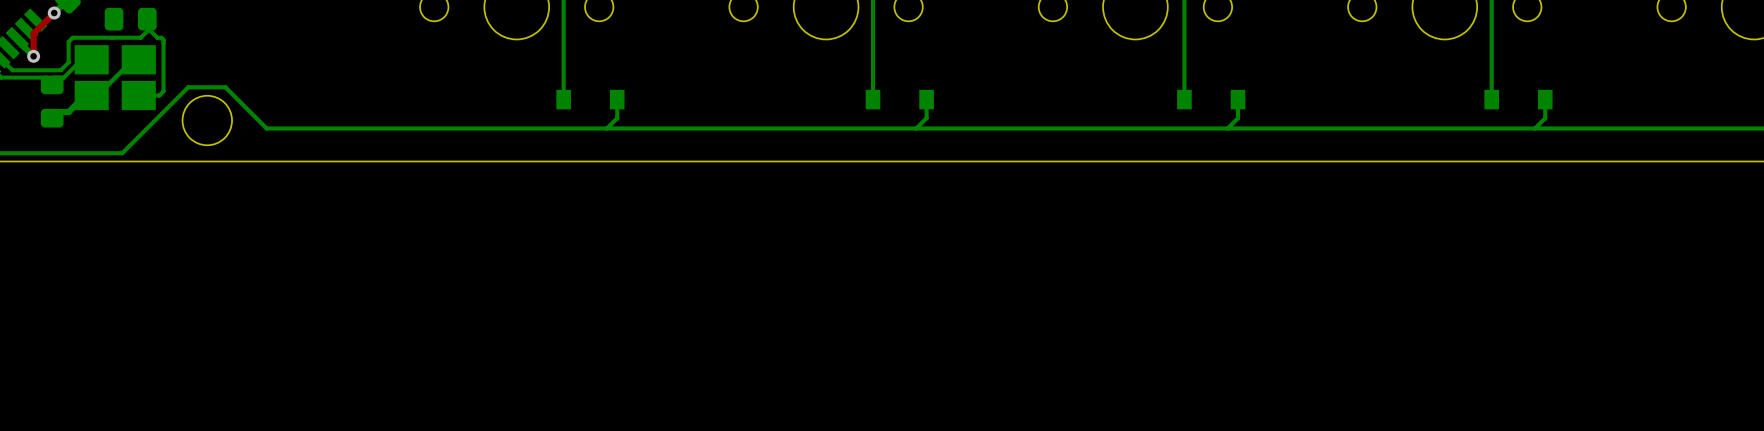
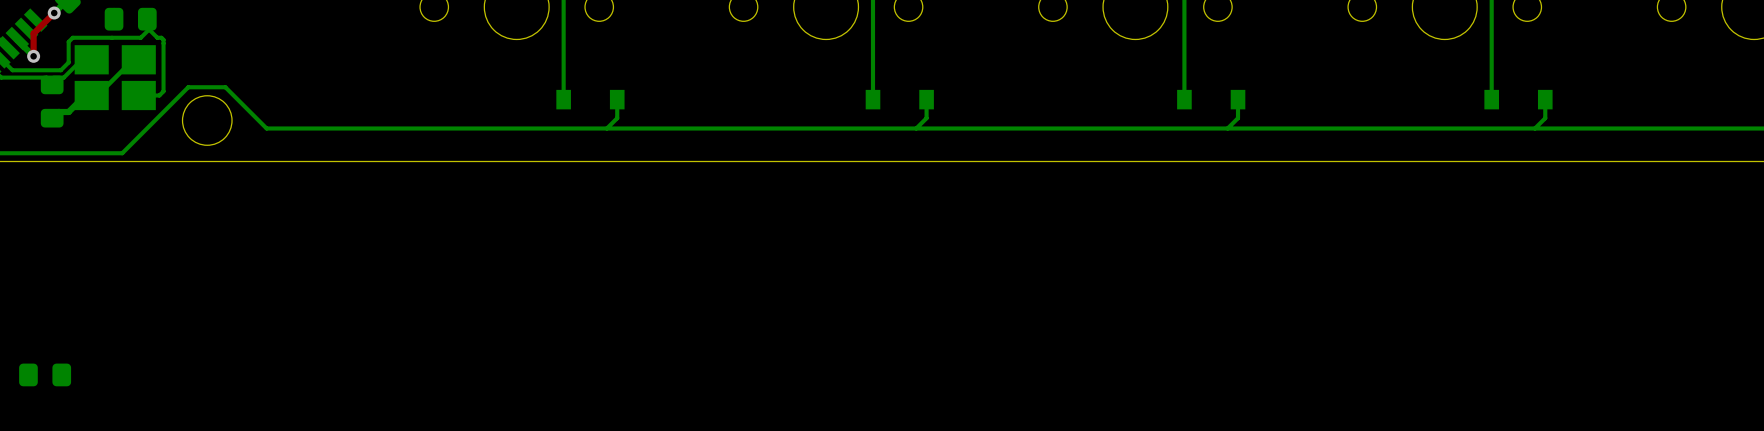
part: none -> (45, 374)

